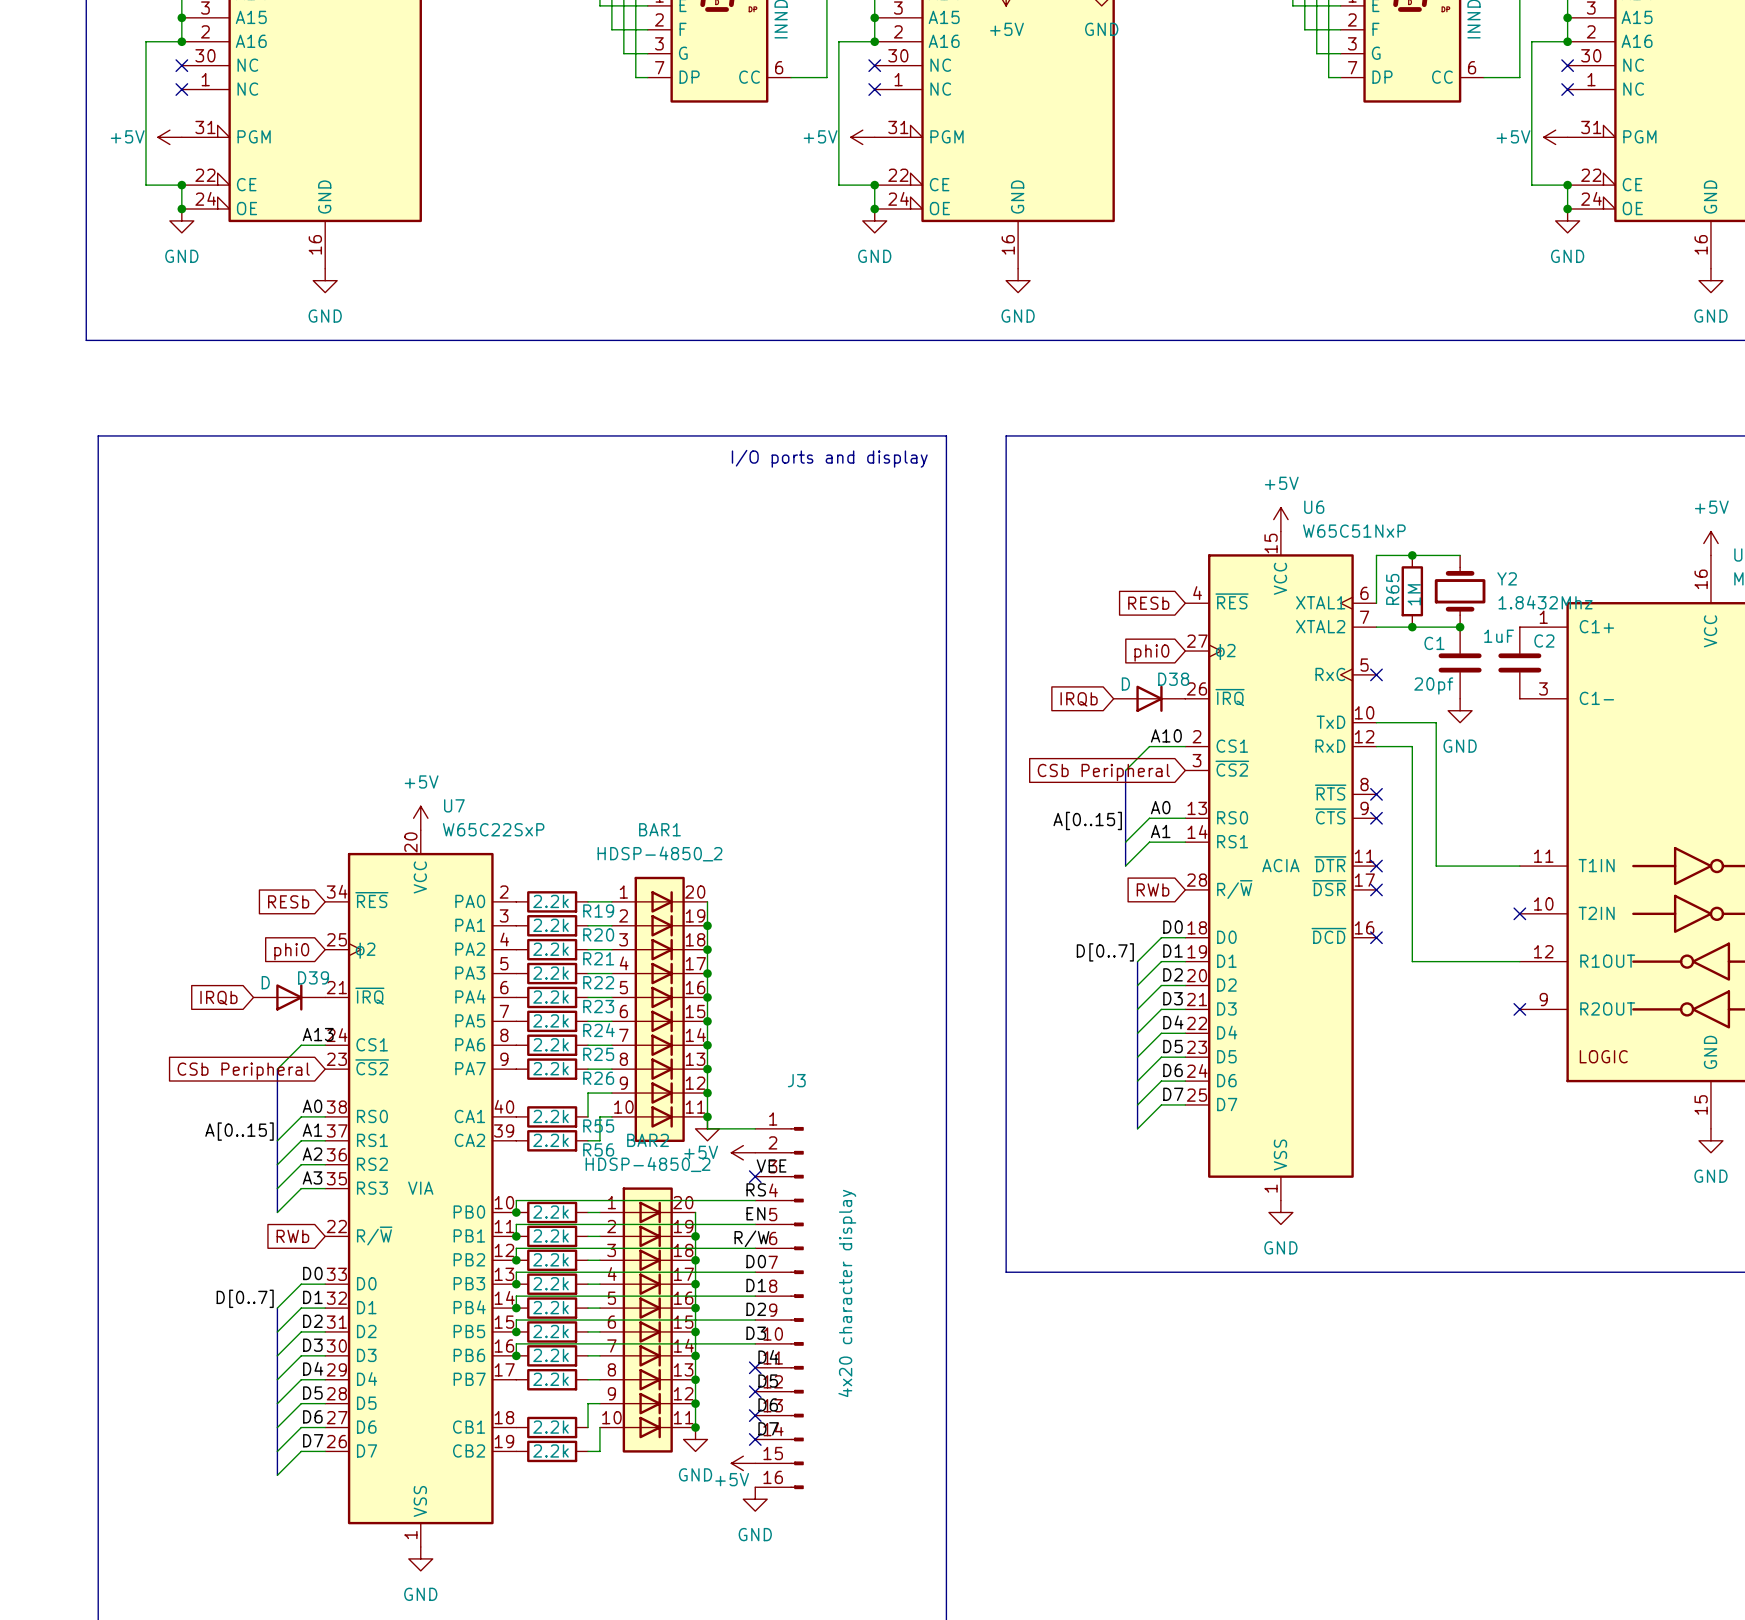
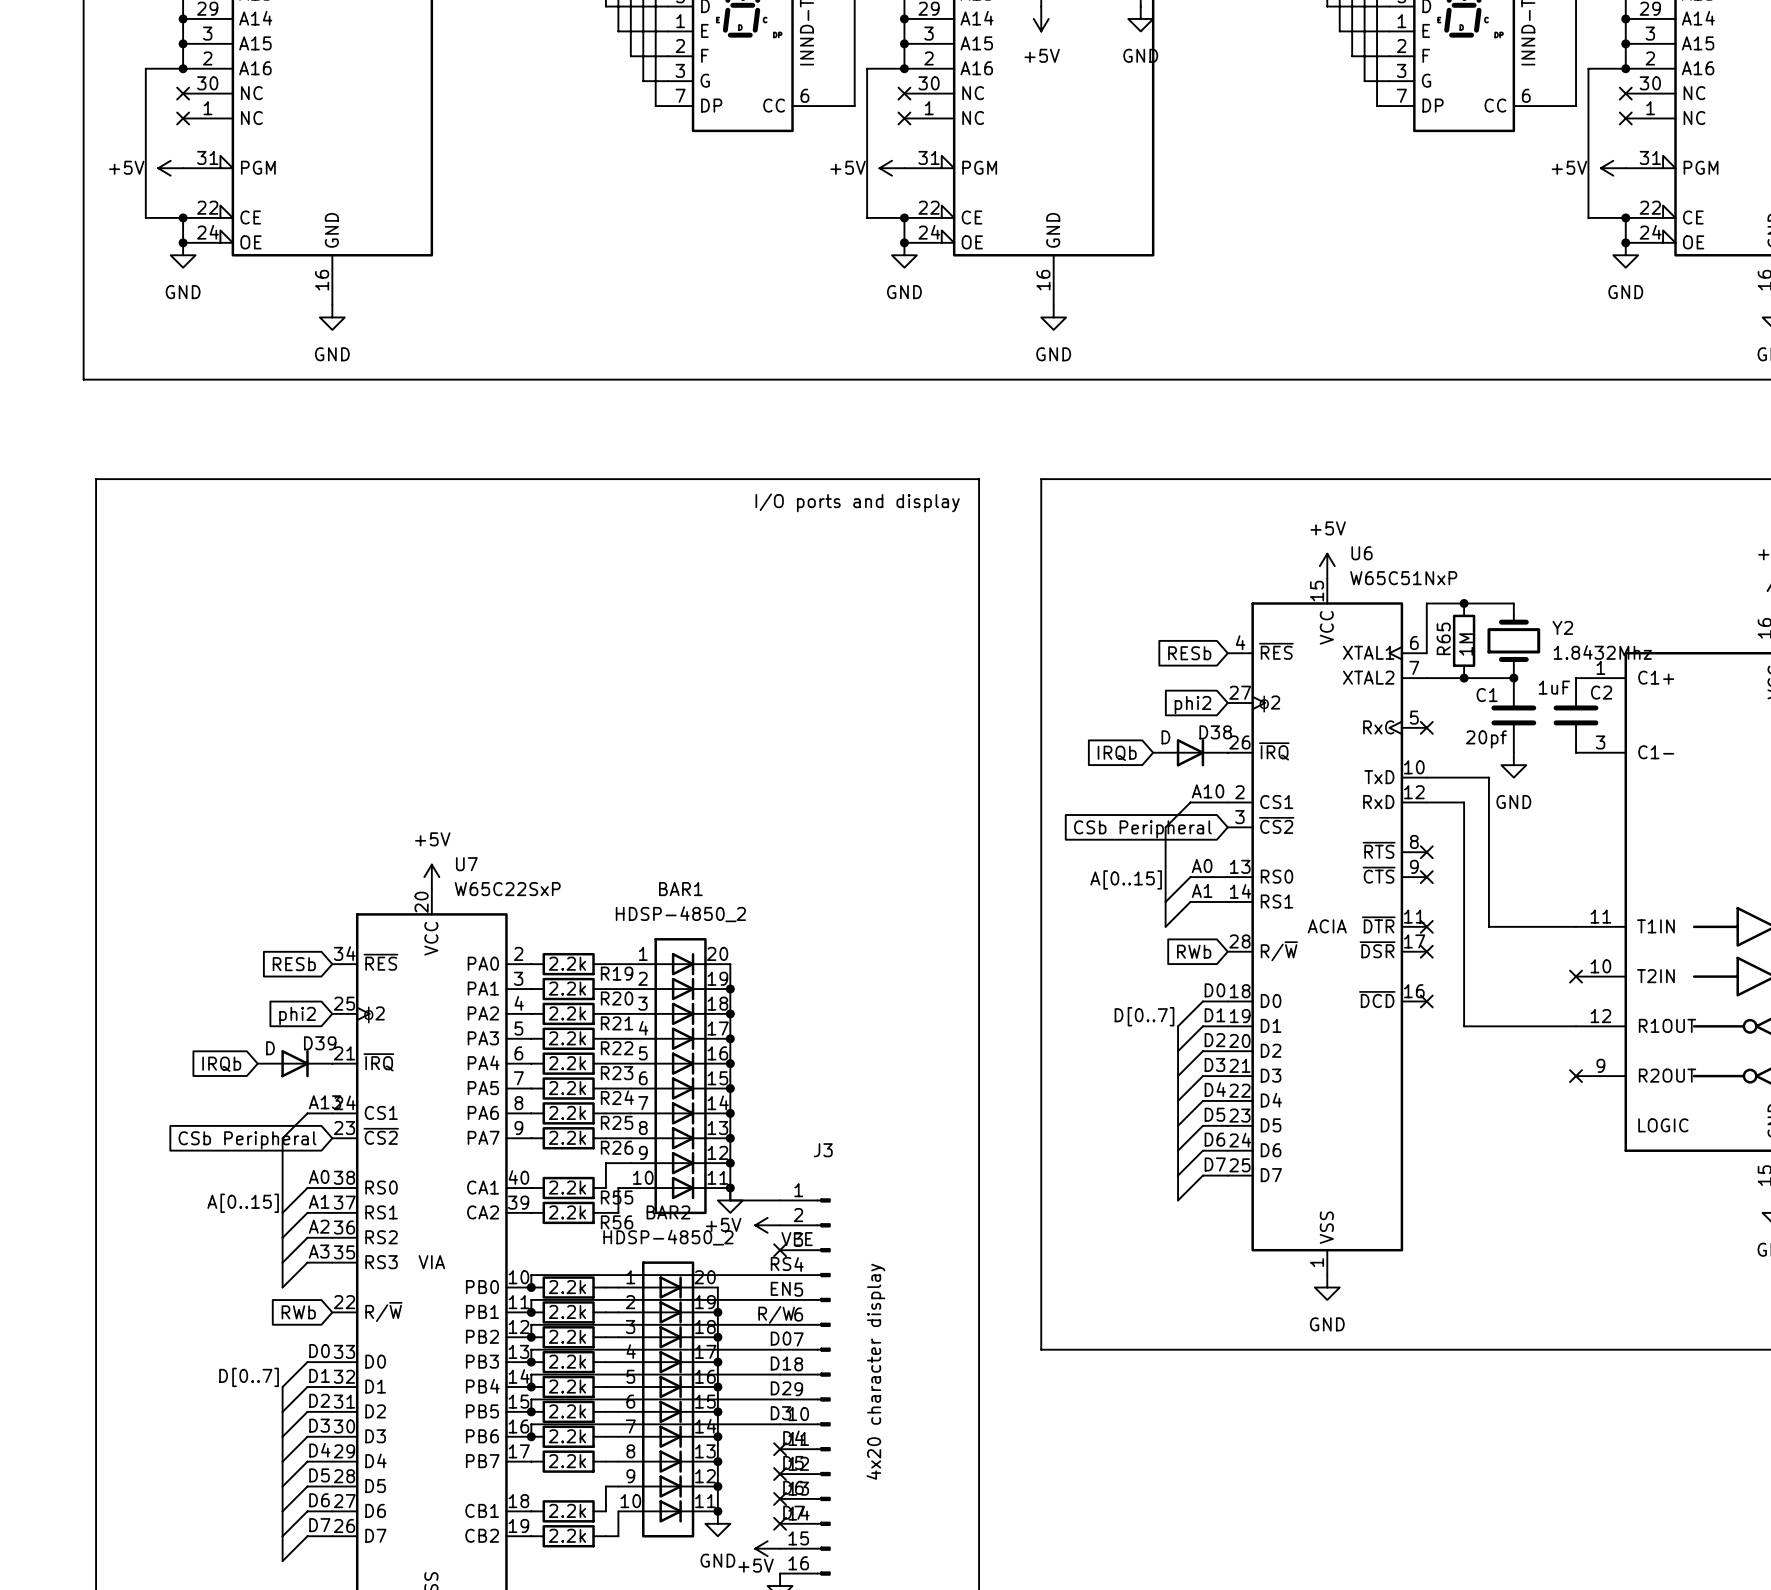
global label: phi0 (1151, 653) -> phi2 (1192, 705)
global label: phi0 (291, 951) -> phi2 (297, 1015)

